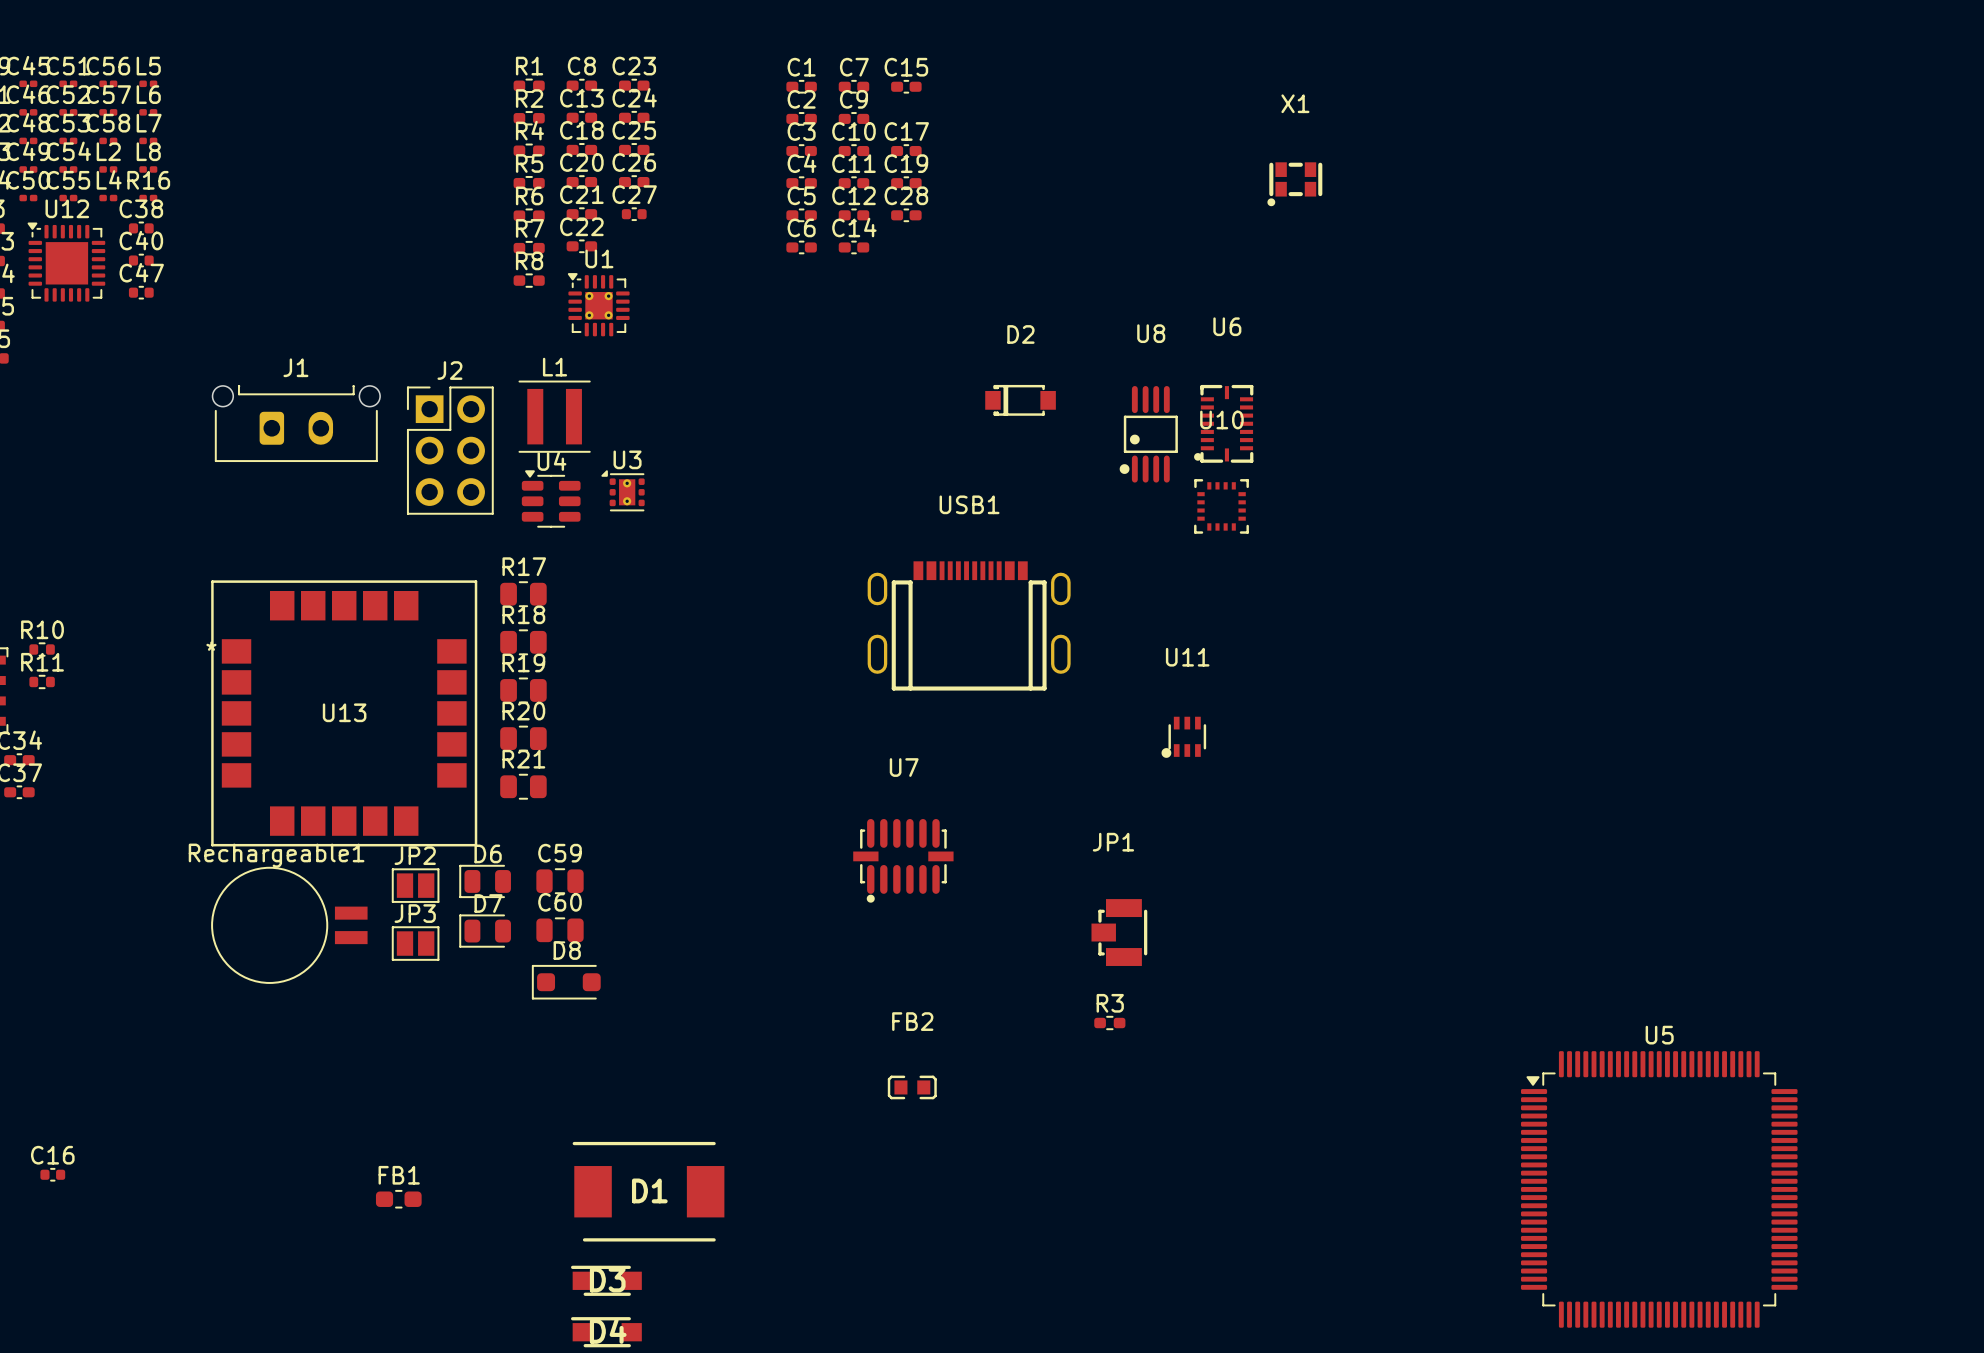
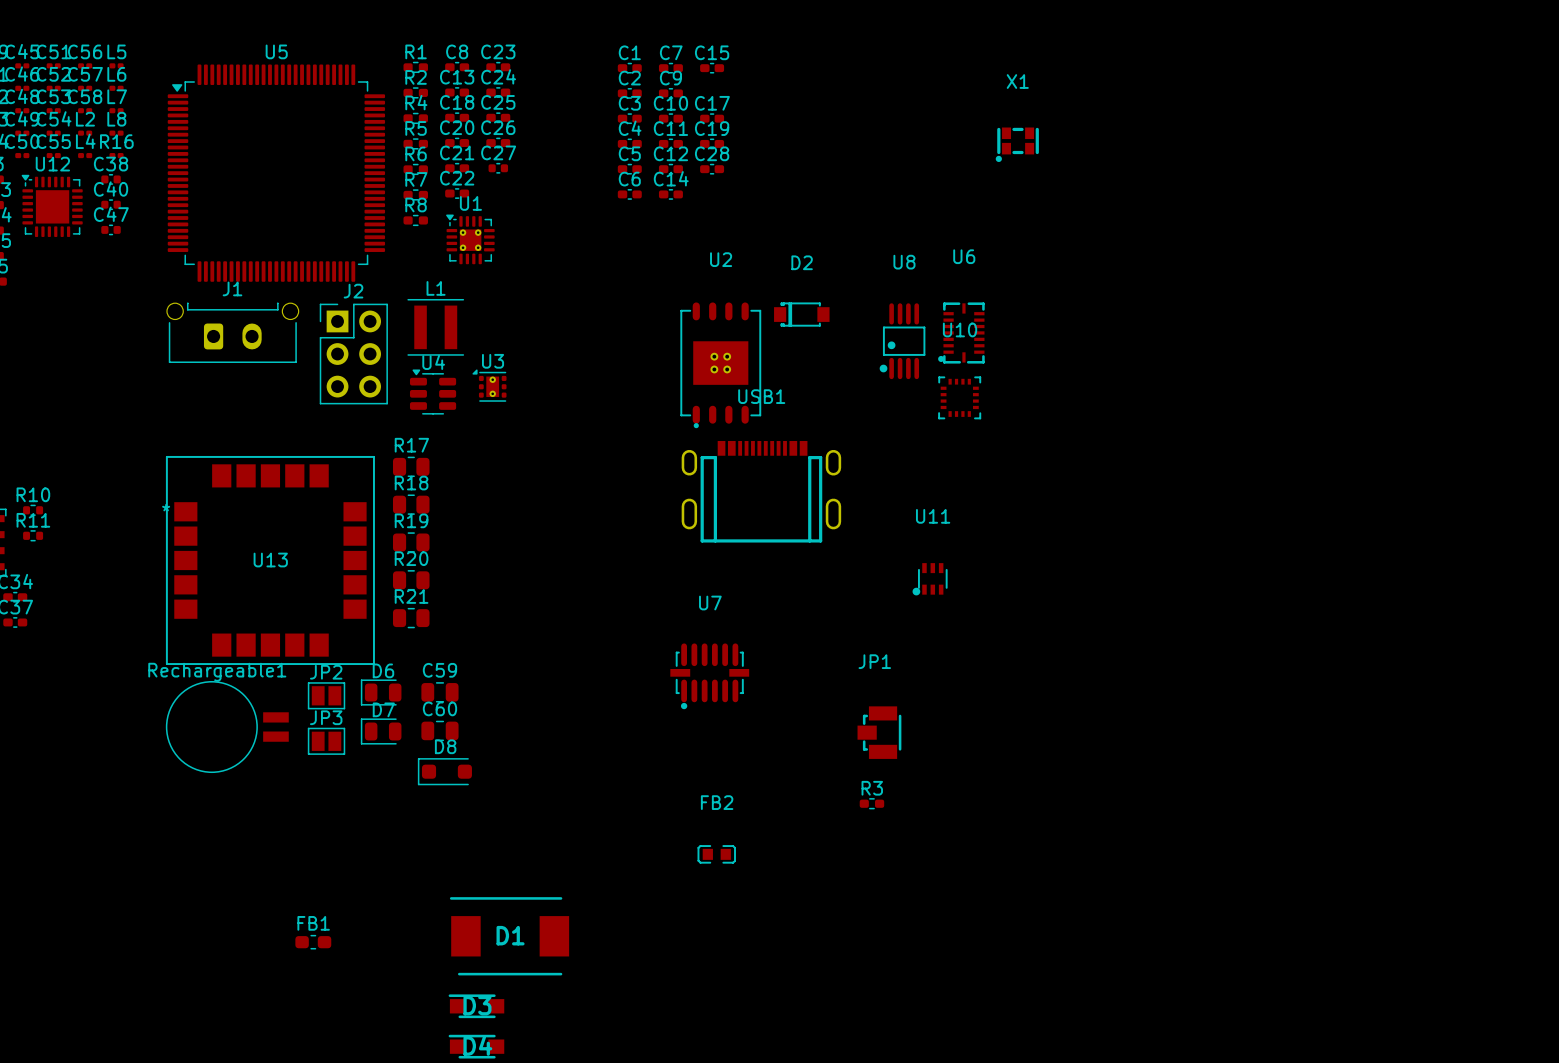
U2: none -> (720, 365)
C16: (52, 1174) -> none
U5 position: (1659, 1189) -> (276, 173)

